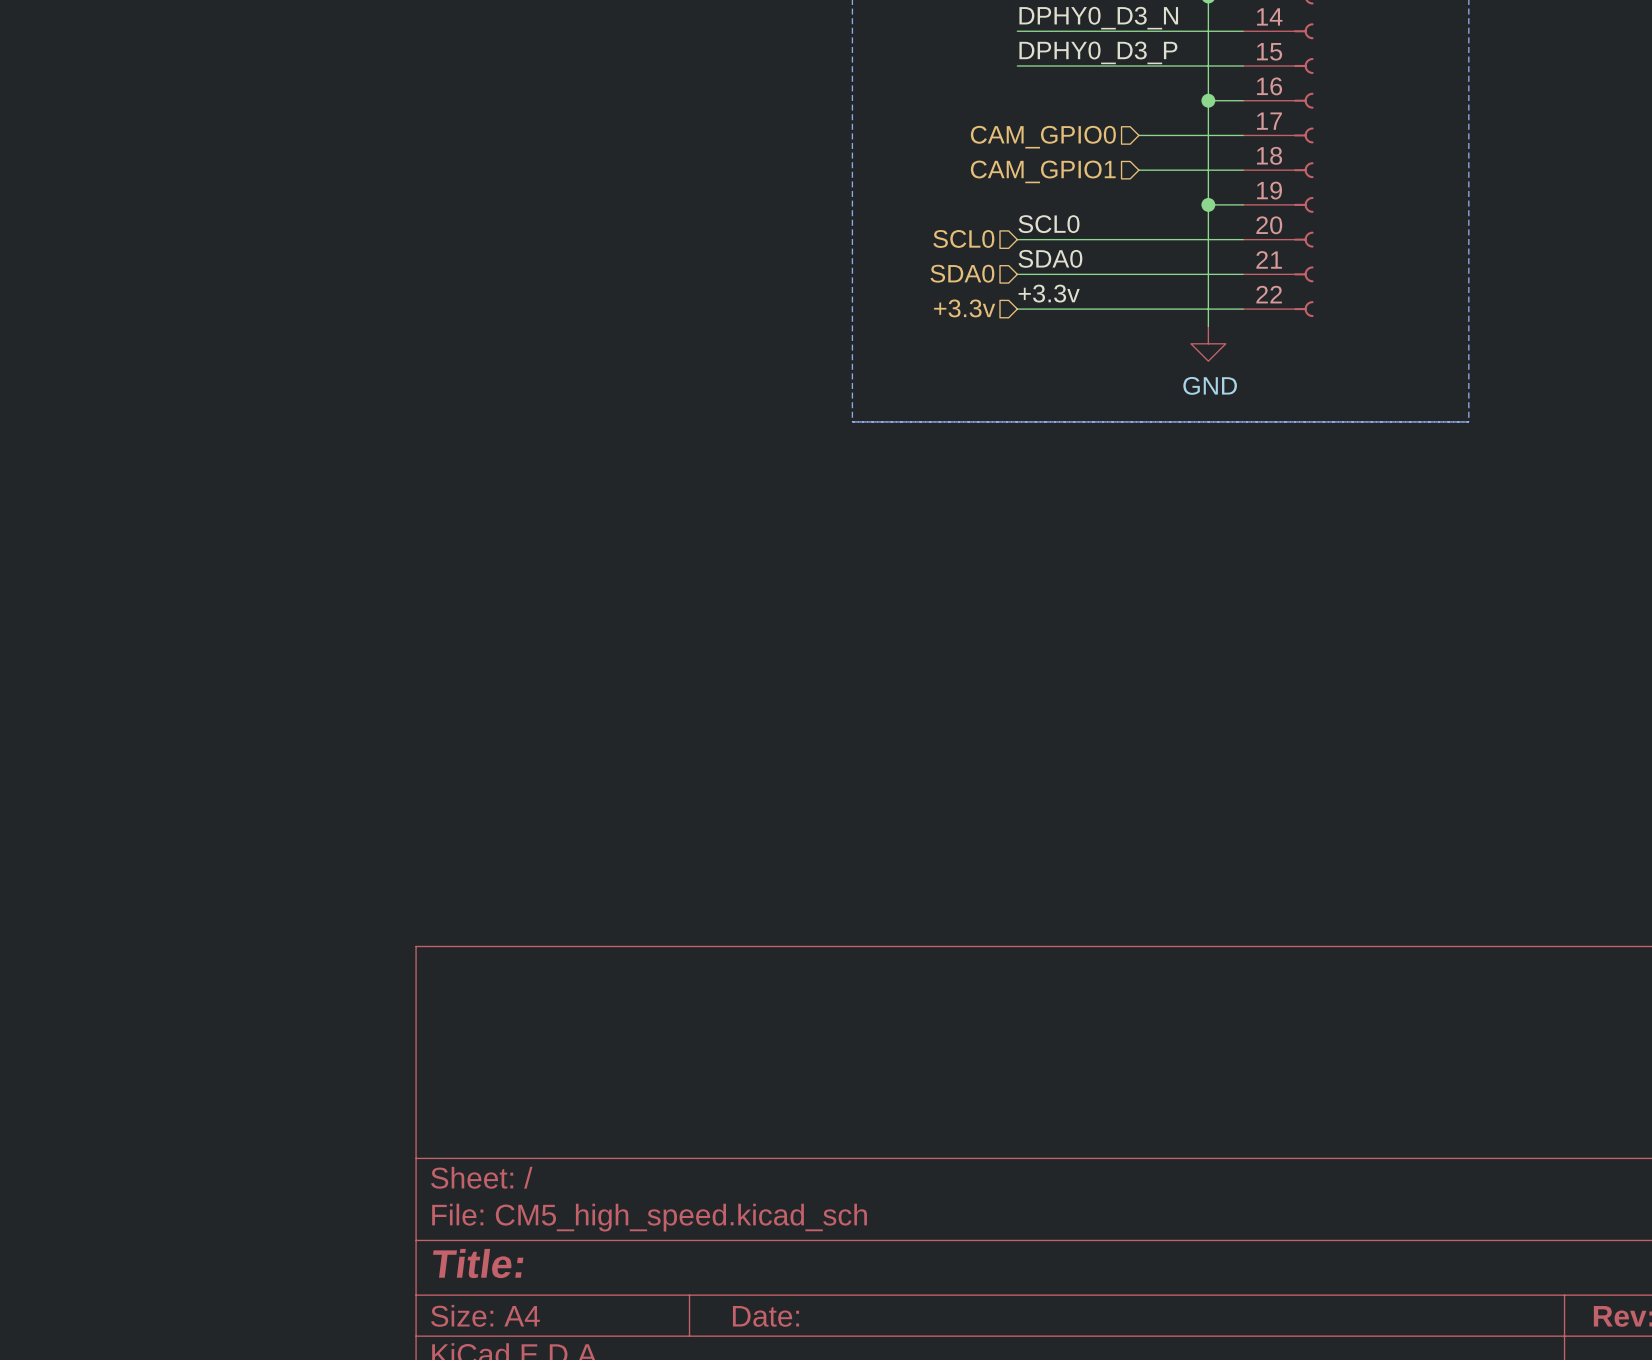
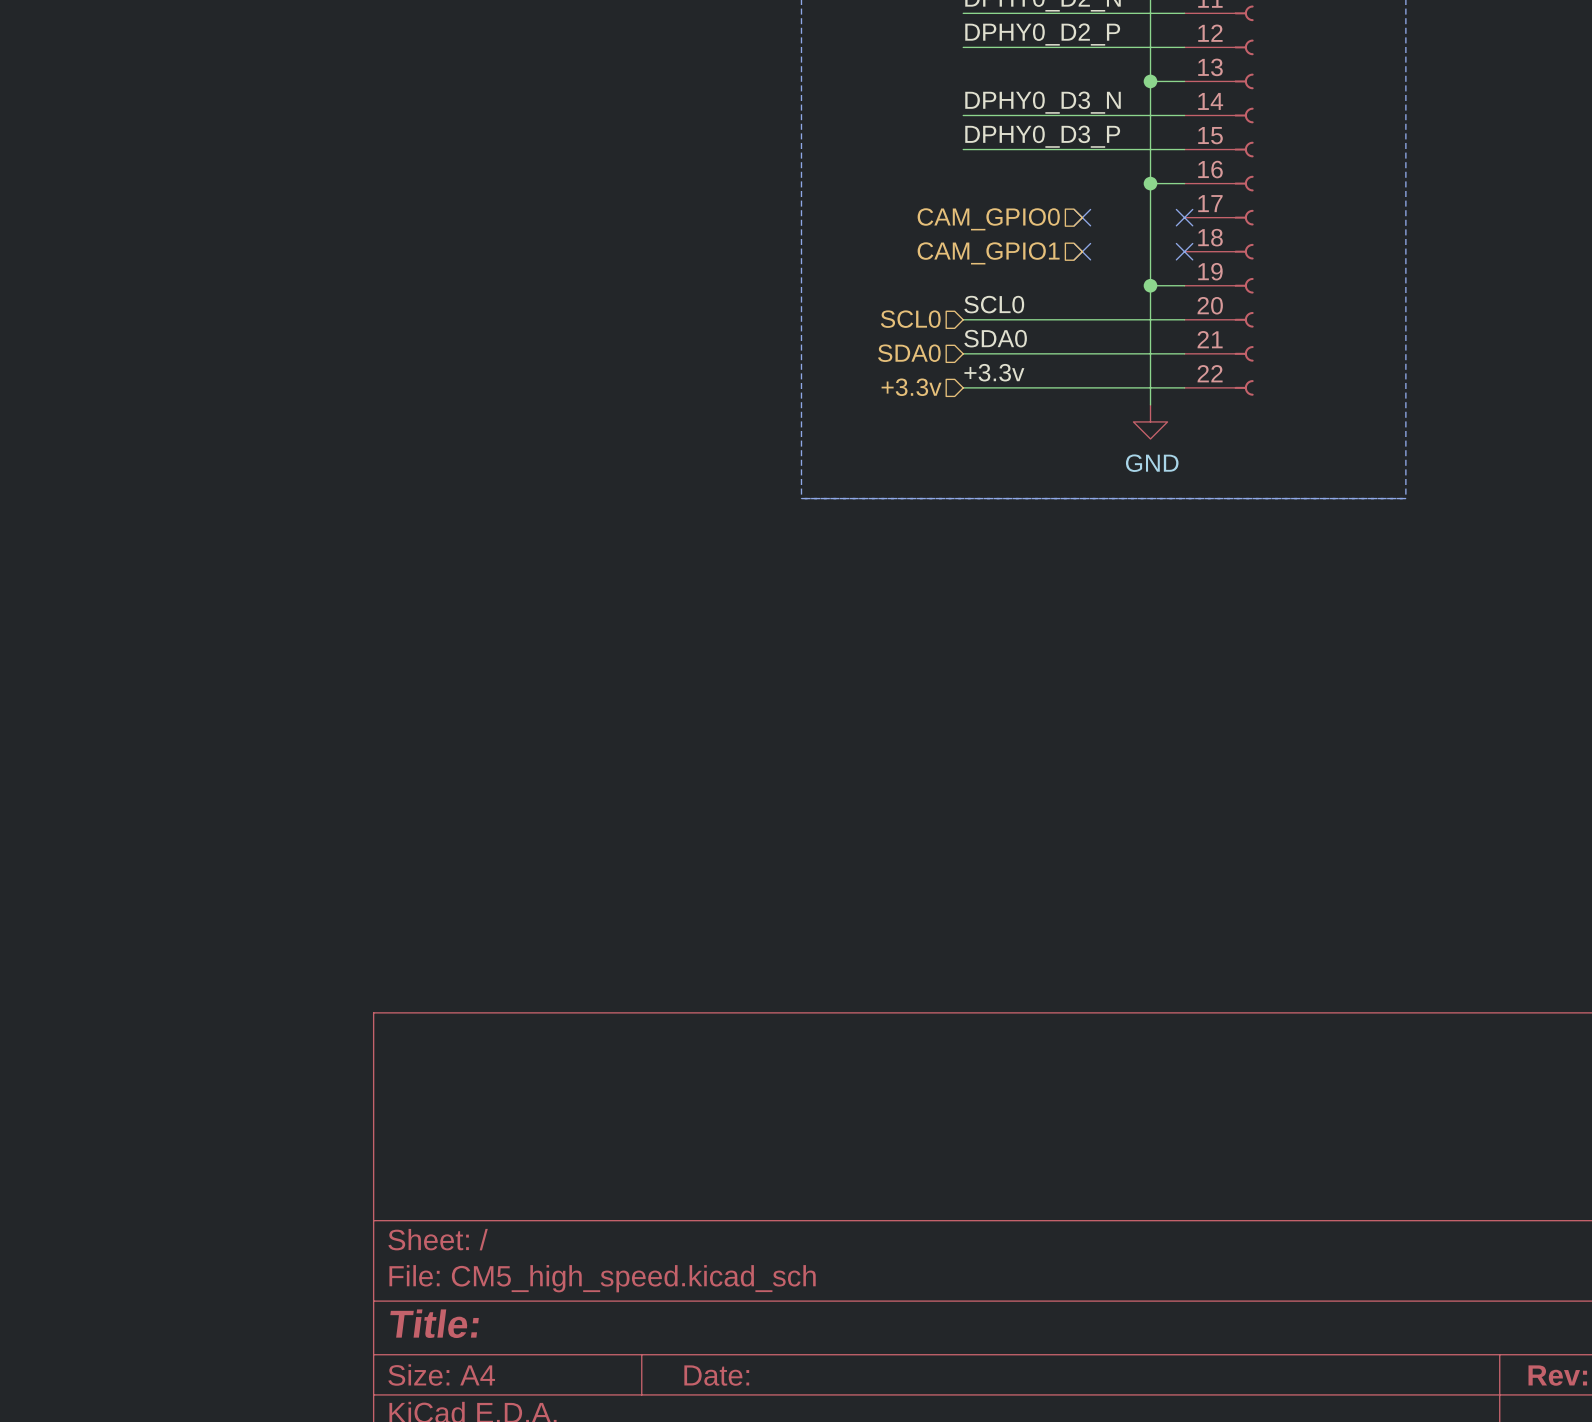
wire: (1138, 135) (1243, 135) -> none
no-connect mark: none -> (1082, 217)
no-connect mark: none -> (1184, 217)
wire: (1138, 170) (1243, 170) -> none
no-connect mark: none -> (1082, 251)
no-connect mark: none -> (1184, 251)

